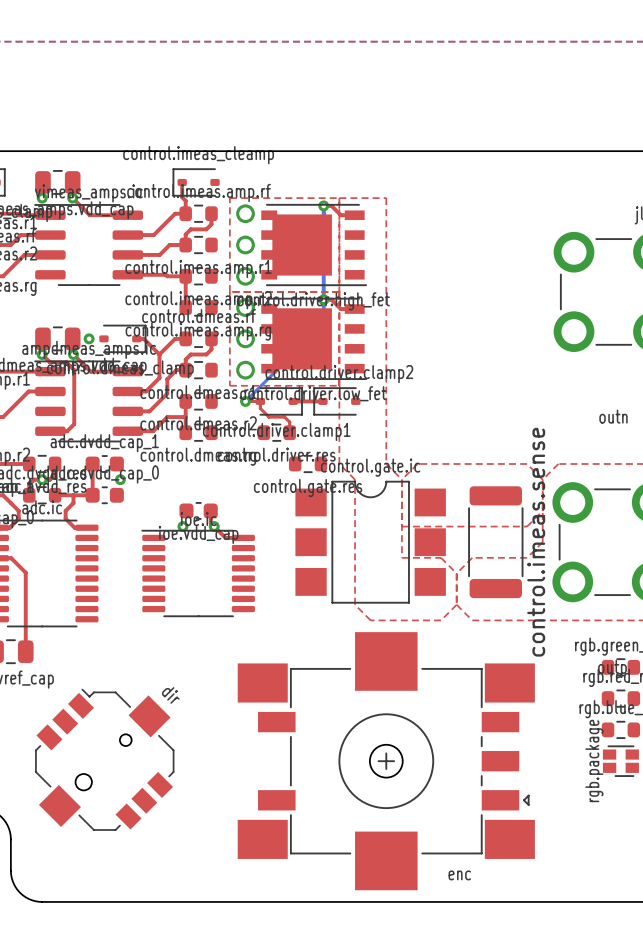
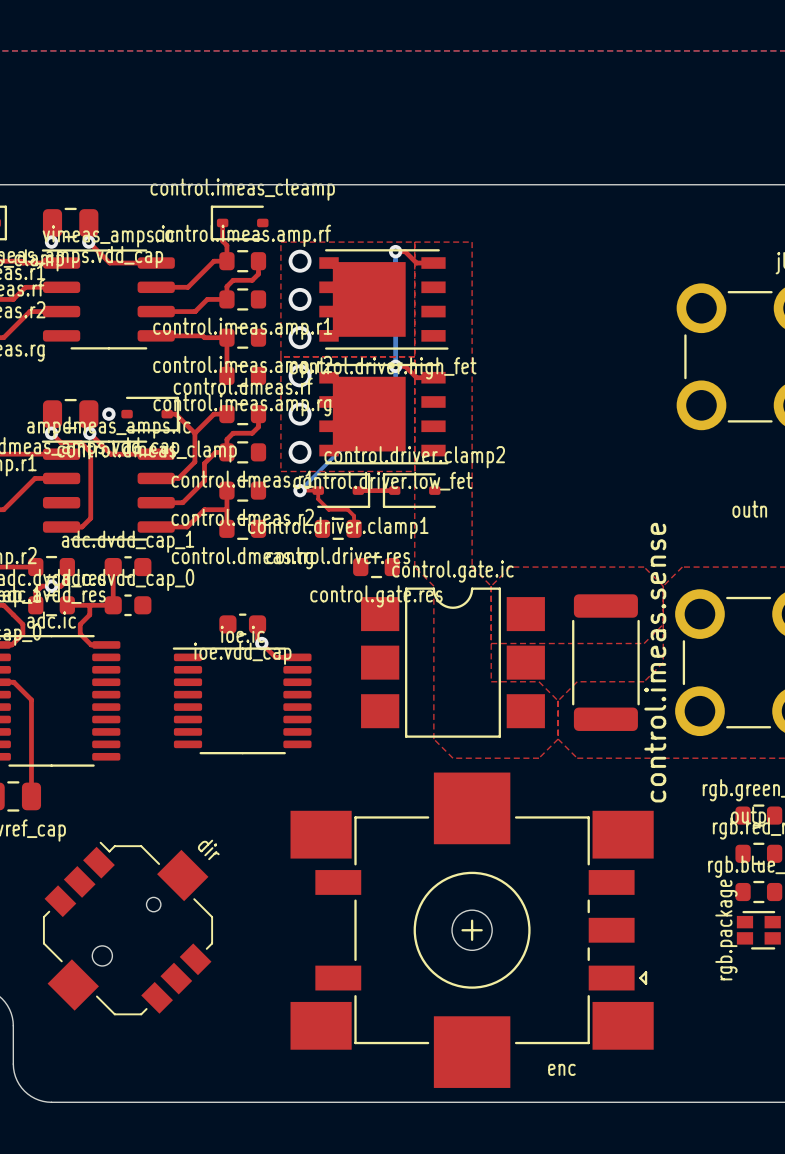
via: (120, 479) -> none
via: (182, 526) -> none

